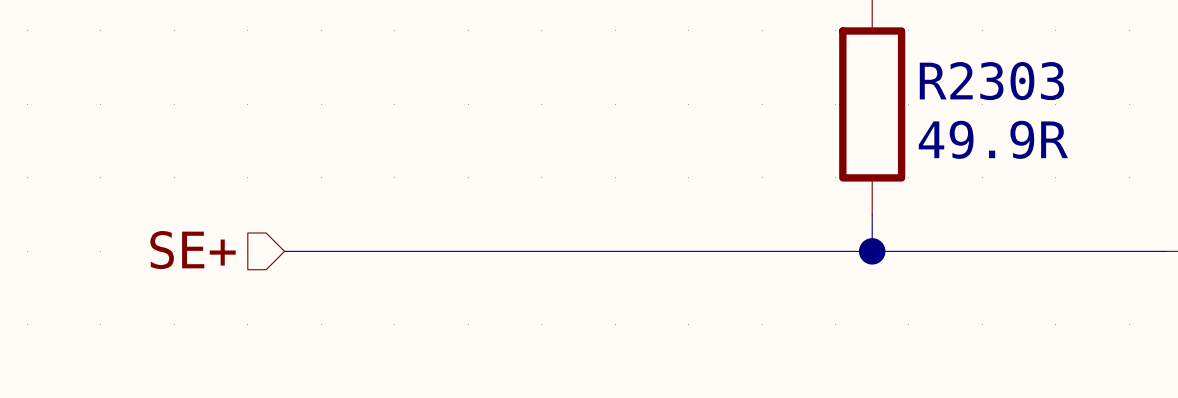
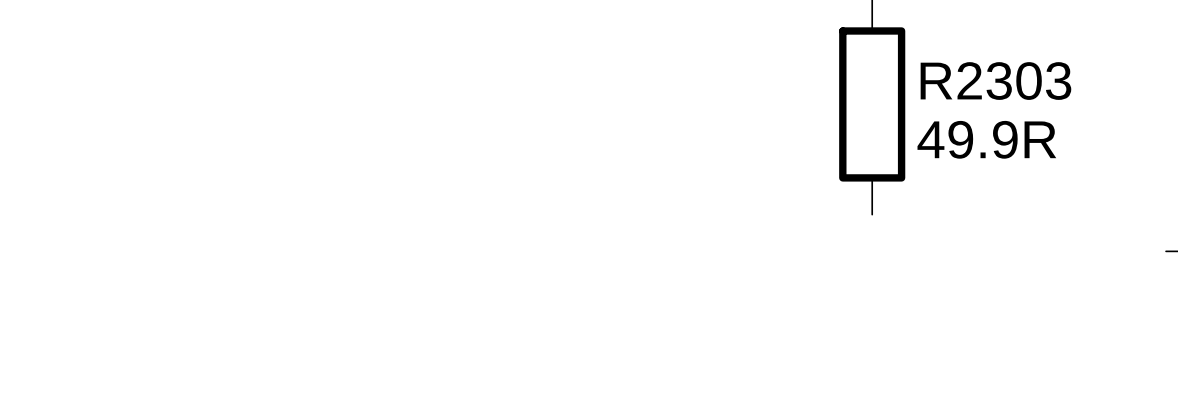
wire: (872, 214) (872, 251) -> none
hierarchical label: SE+ (193, 250) -> none
wire: (284, 251) (1166, 251) -> none
junction: (872, 251) -> none

